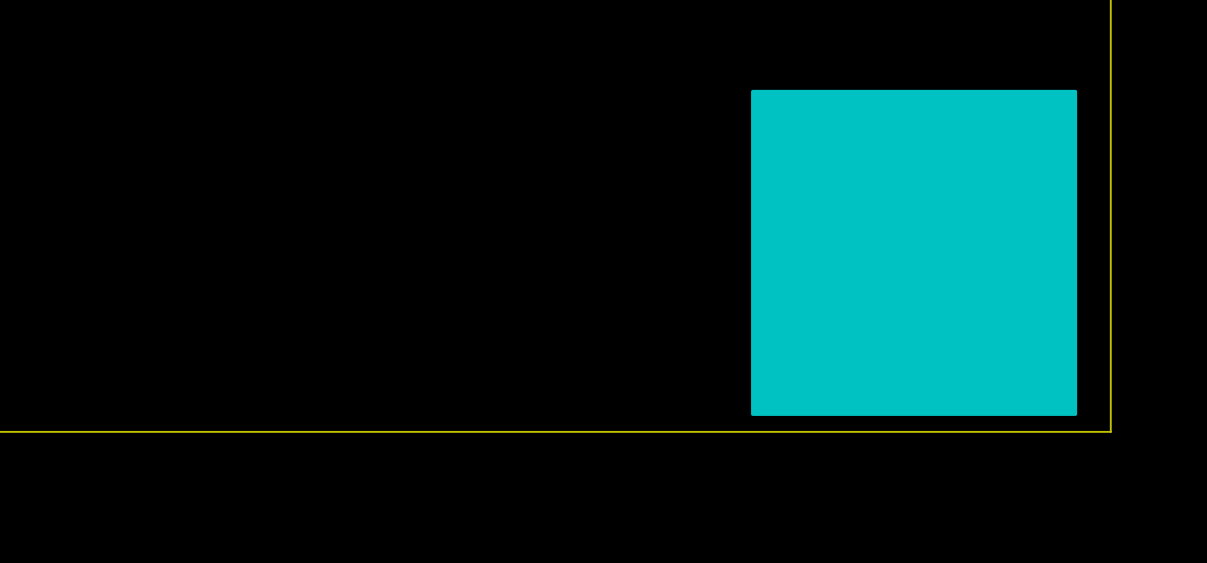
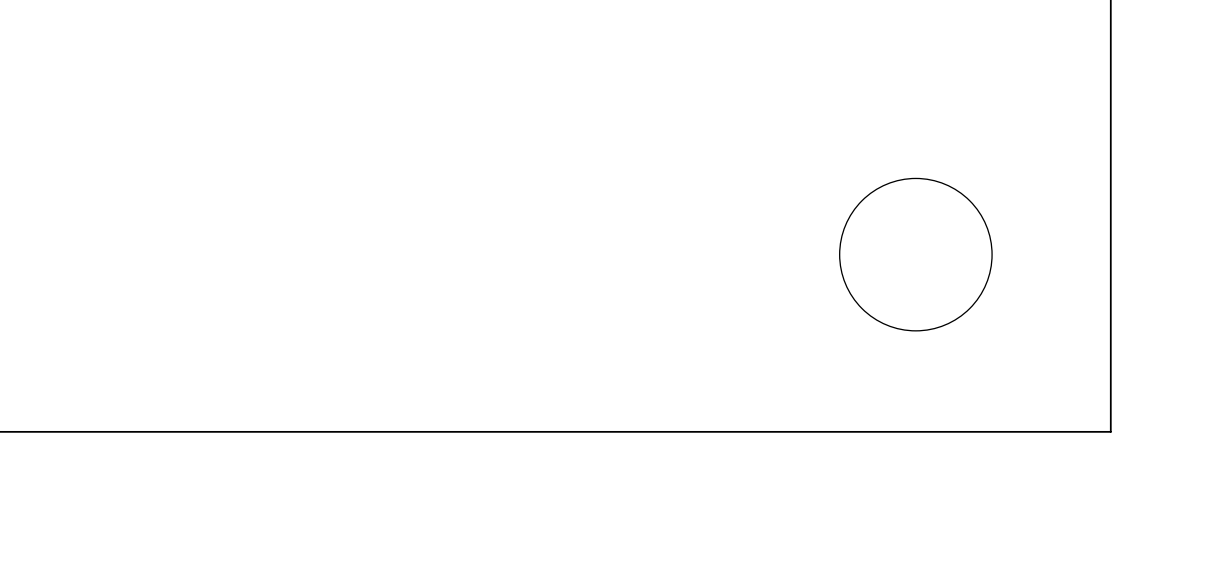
drawing: [751, 89, 1078, 416] -> none

